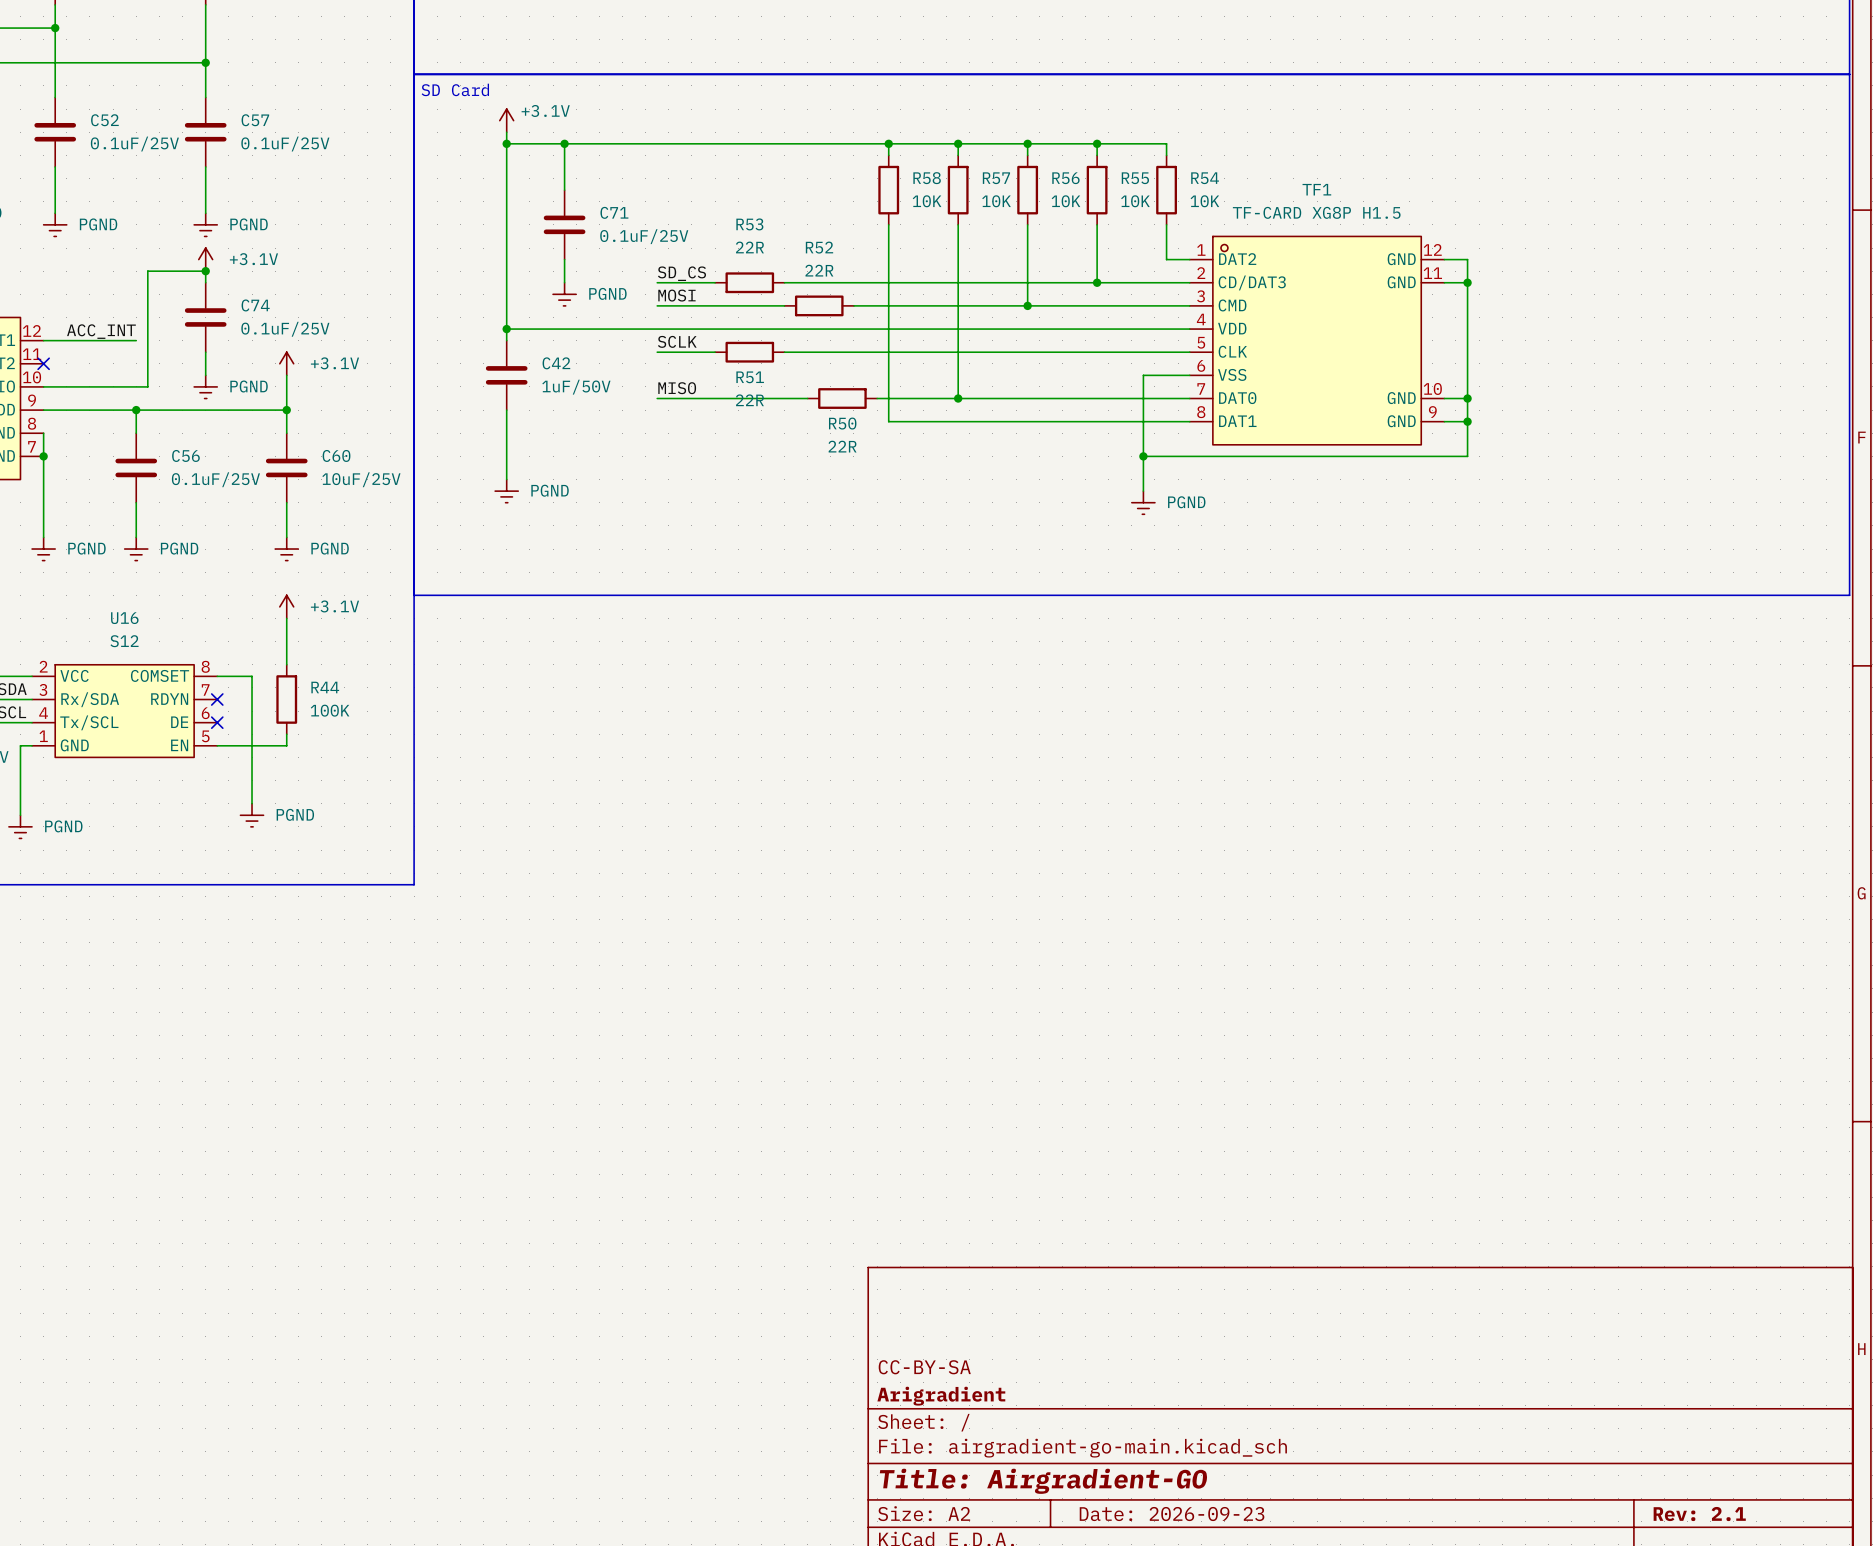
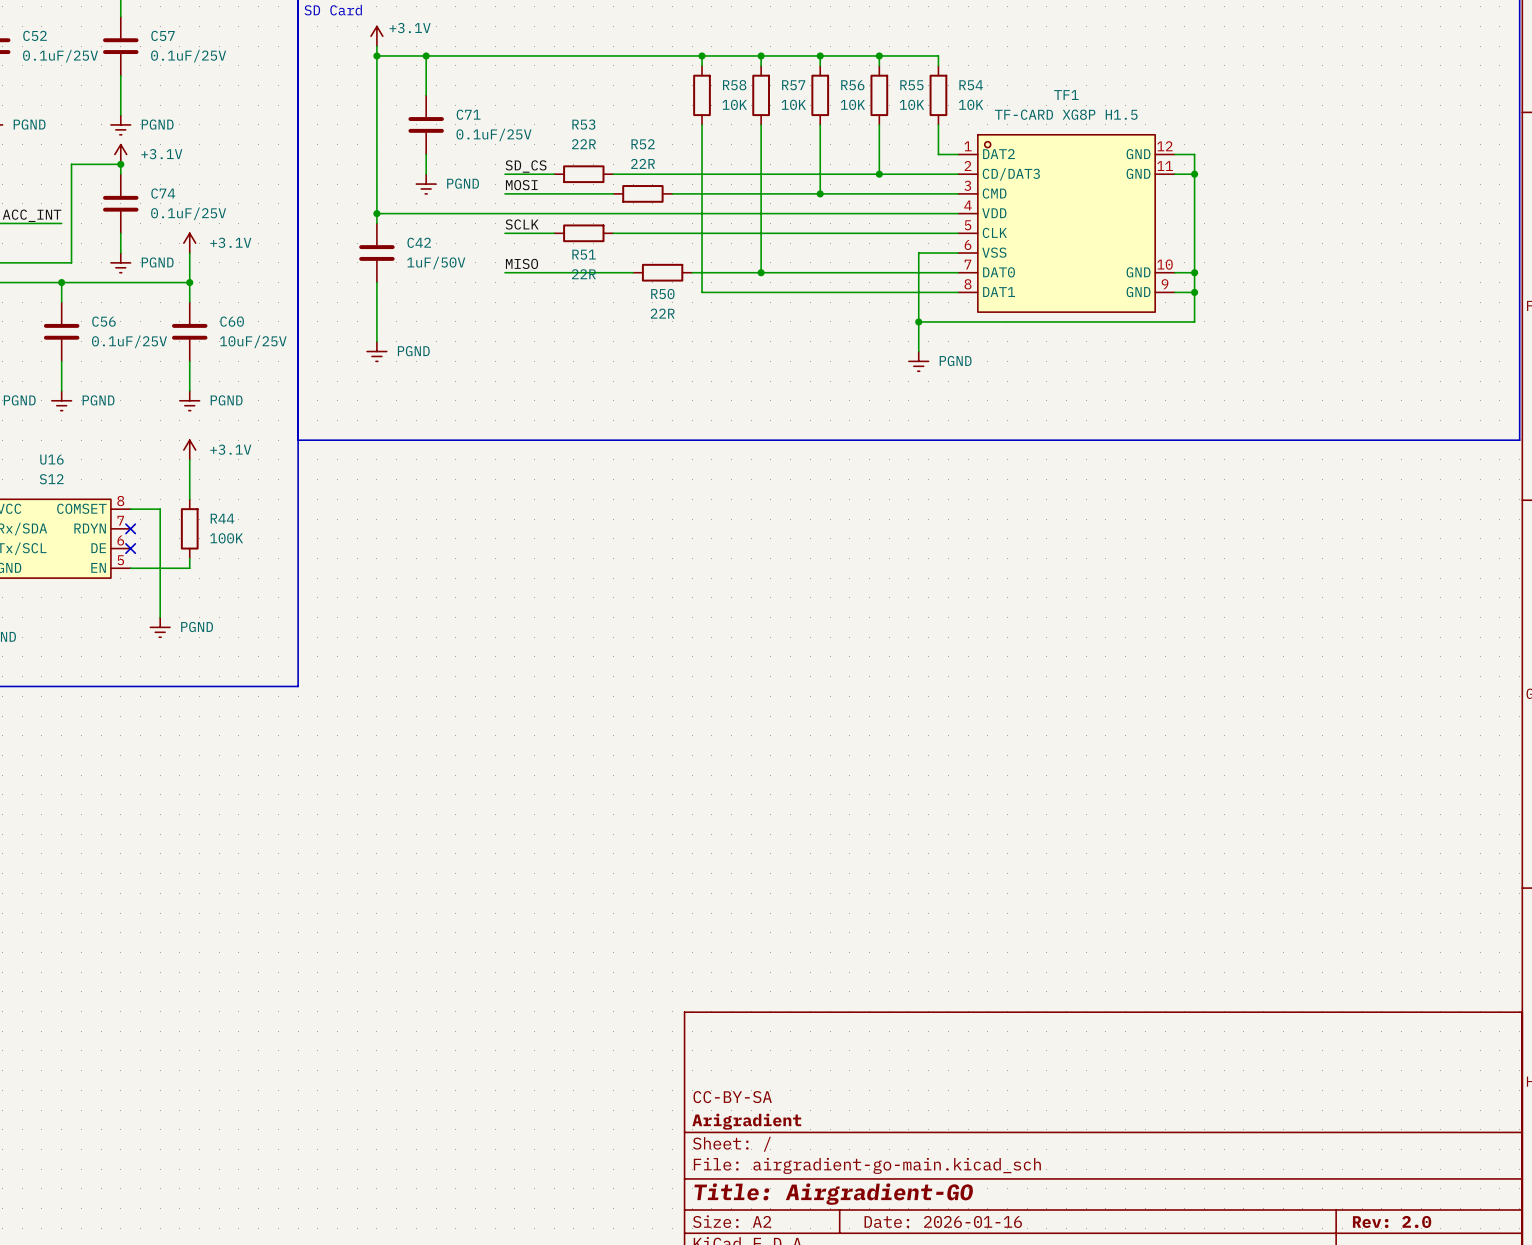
title block: Date: 2026-09-23 (1172, 1514) -> Date: 2026-01-16 (943, 1221)
title block: Rev: 2.1 (1699, 1514) -> Rev: 2.0 (1392, 1221)

